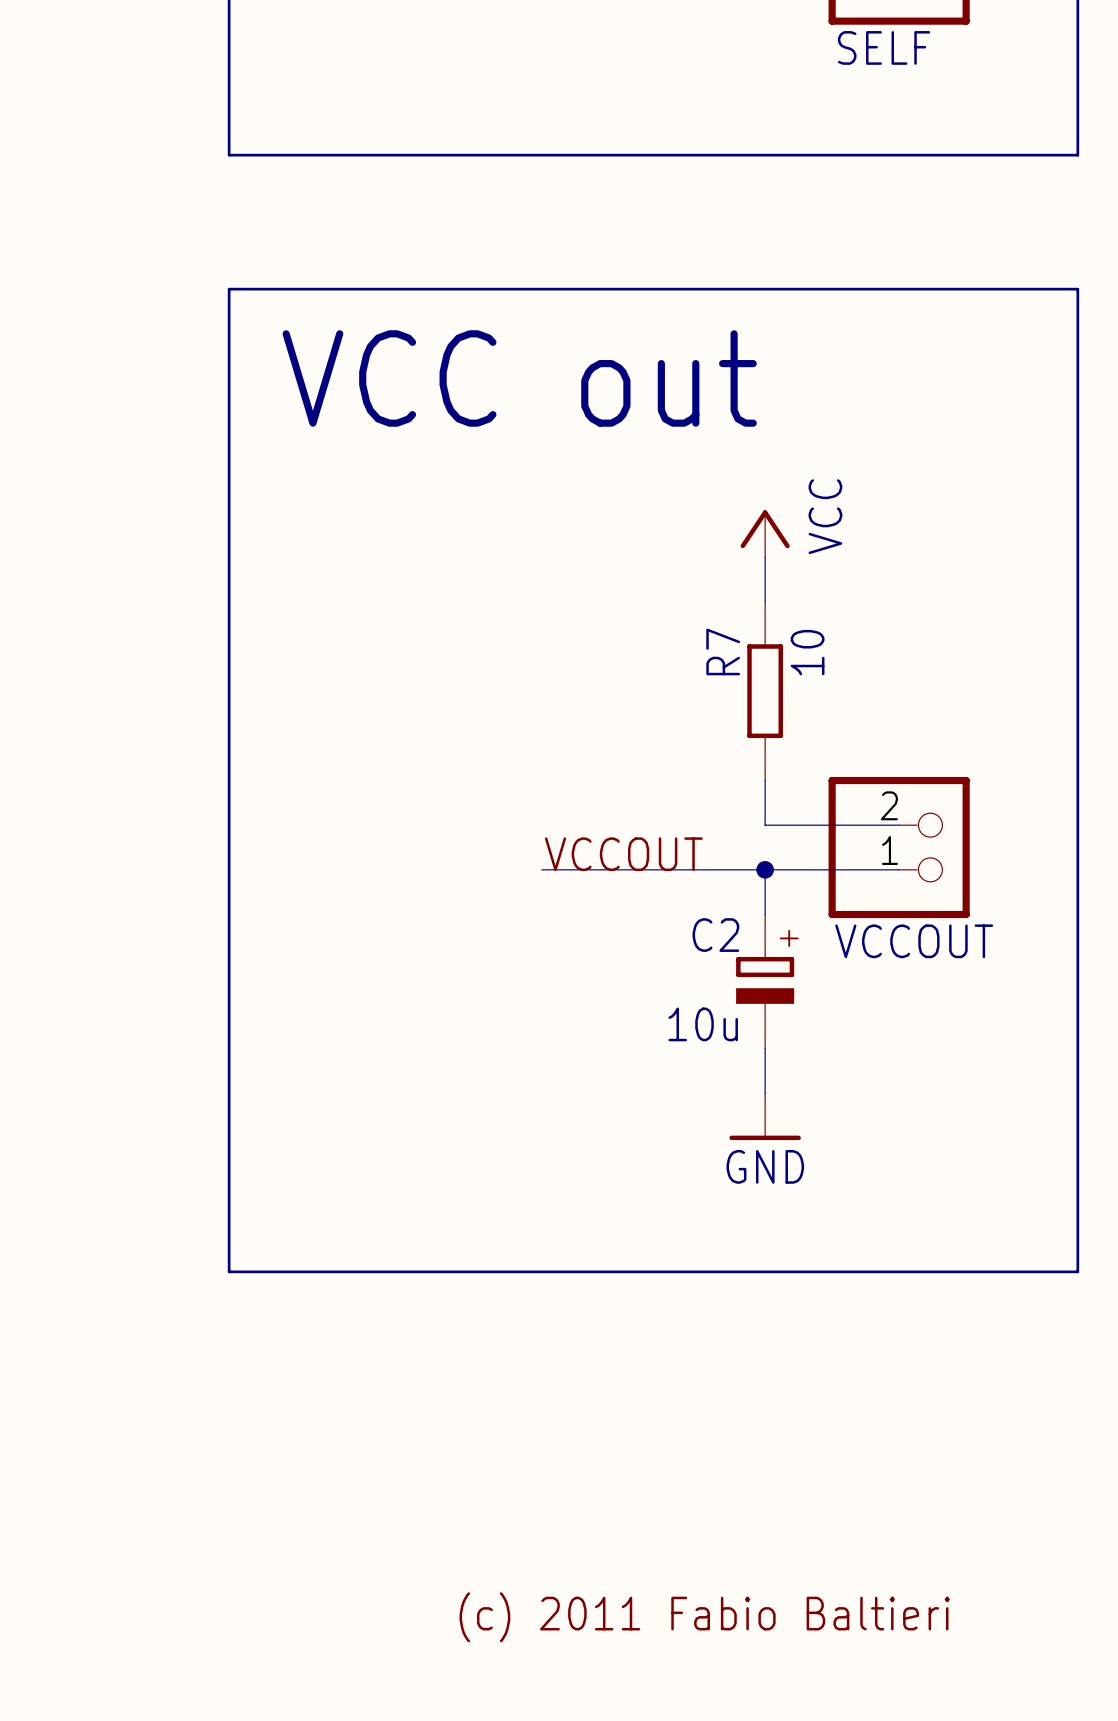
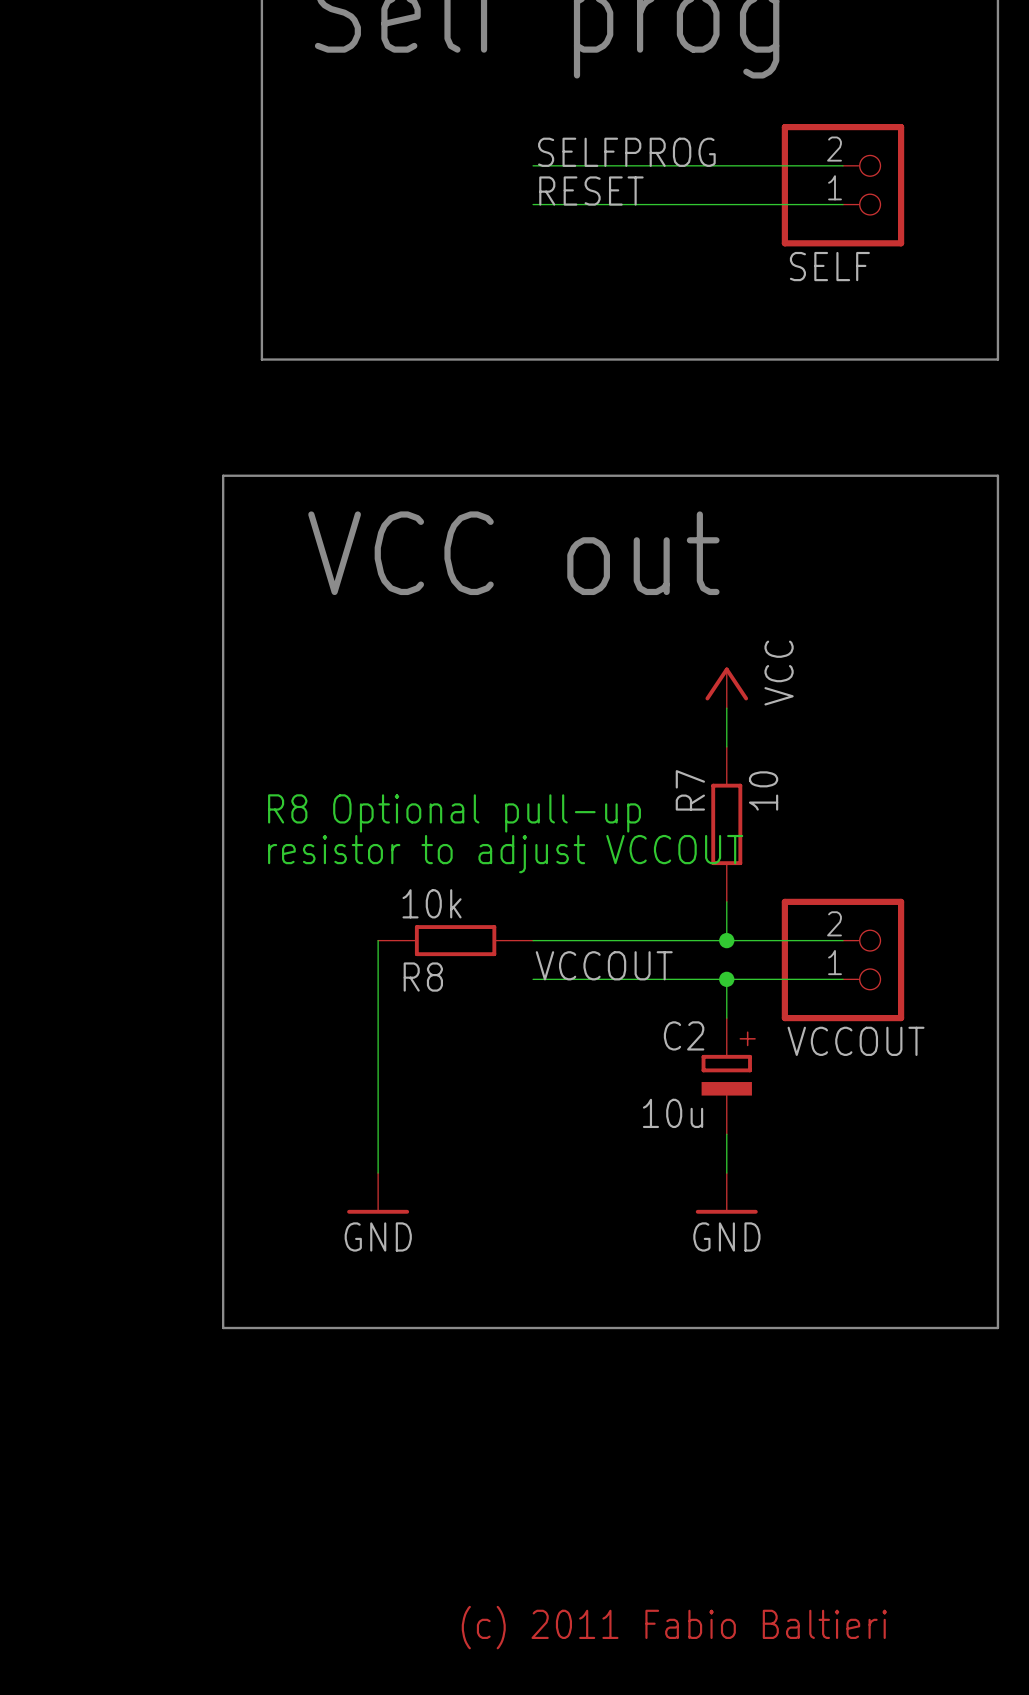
line: (229, 289) (229, 1271) -> (261, 475) (223, 475) (223, 1328) (261, 1328)
text: none -> R8 Optional pull-up (454, 813)
text: none -> resistor to adjust VCCOUT (505, 854)
wire: none -> (378, 940) (378, 1173)
R8: none -> 10k (455, 940)
wire: none -> (533, 940) (726, 940)
junction: none -> (726, 940)
power symbol: none -> GND (378, 1193)

